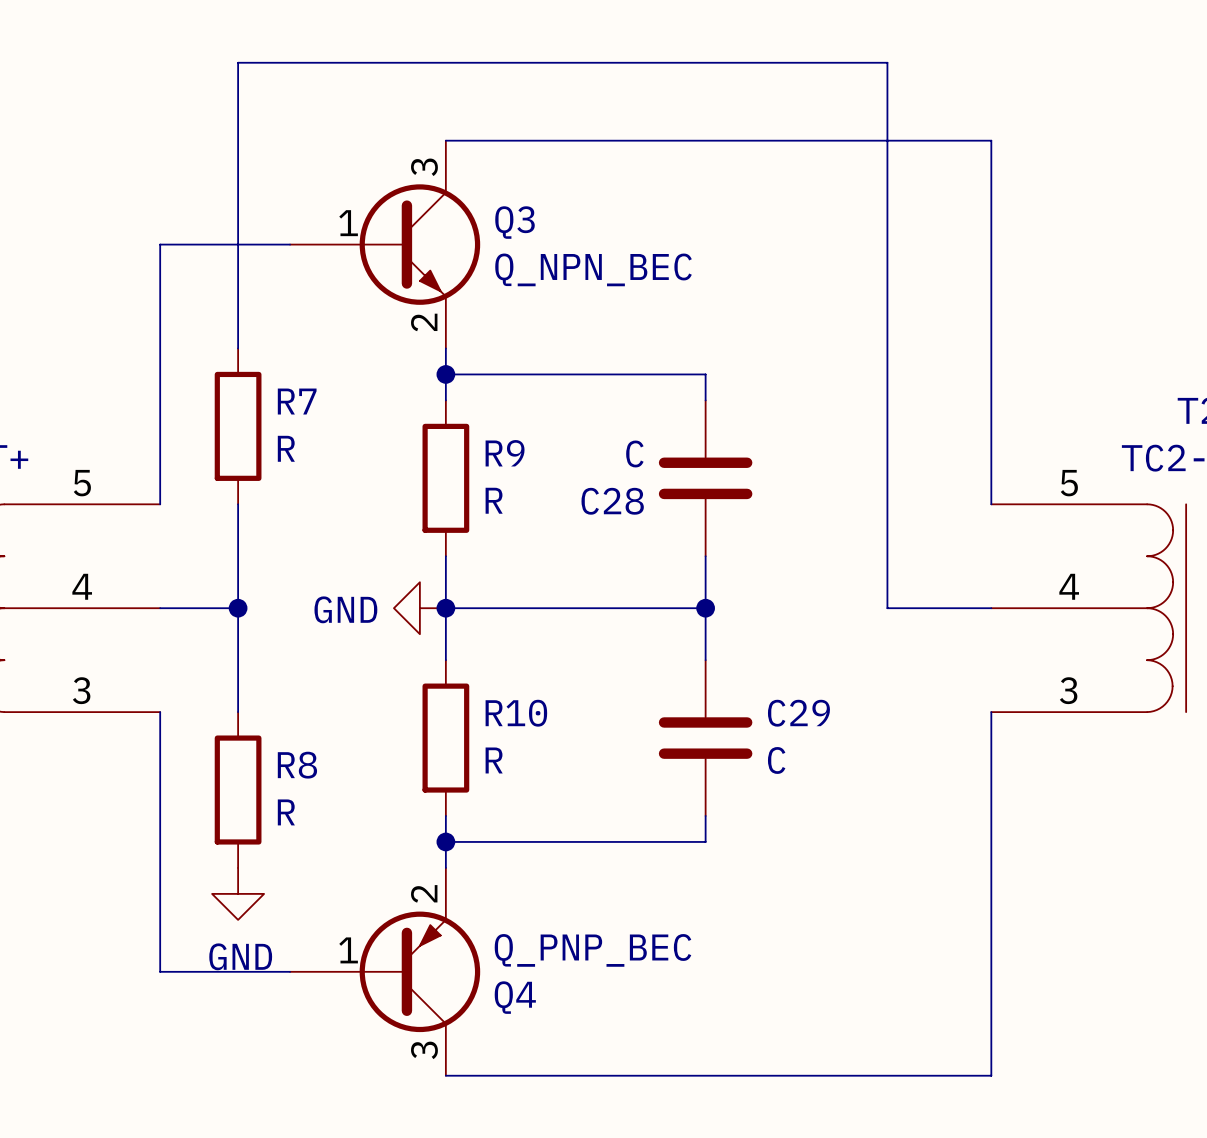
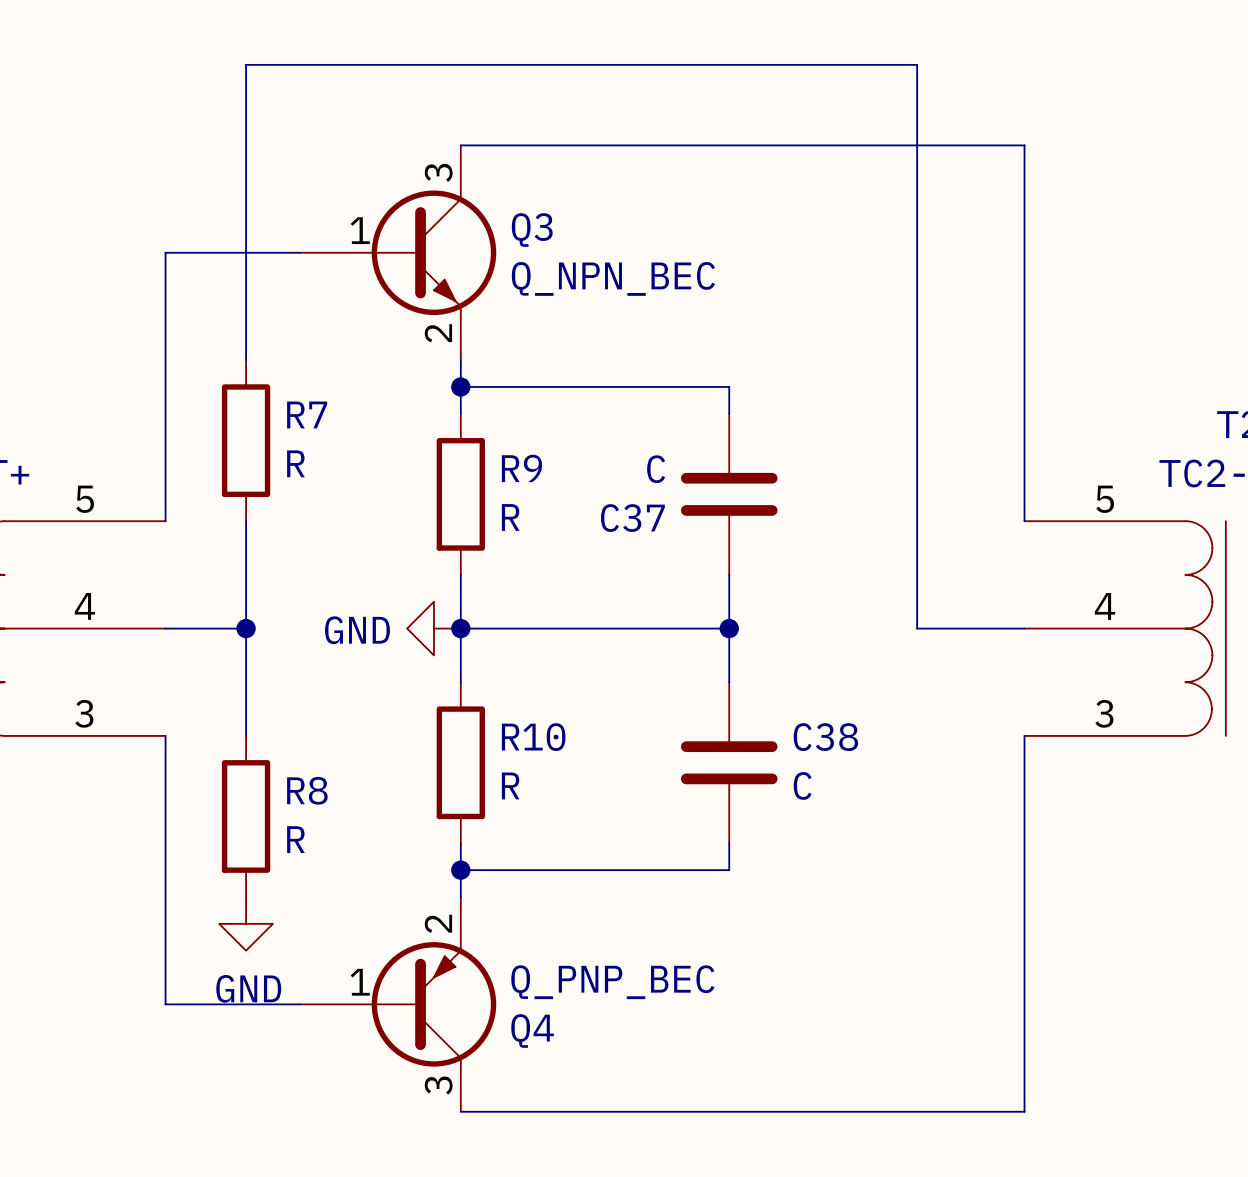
C28 name: C28 (612, 501) -> C37 (632, 518)
C29 name: C29 (798, 713) -> C38 (825, 737)

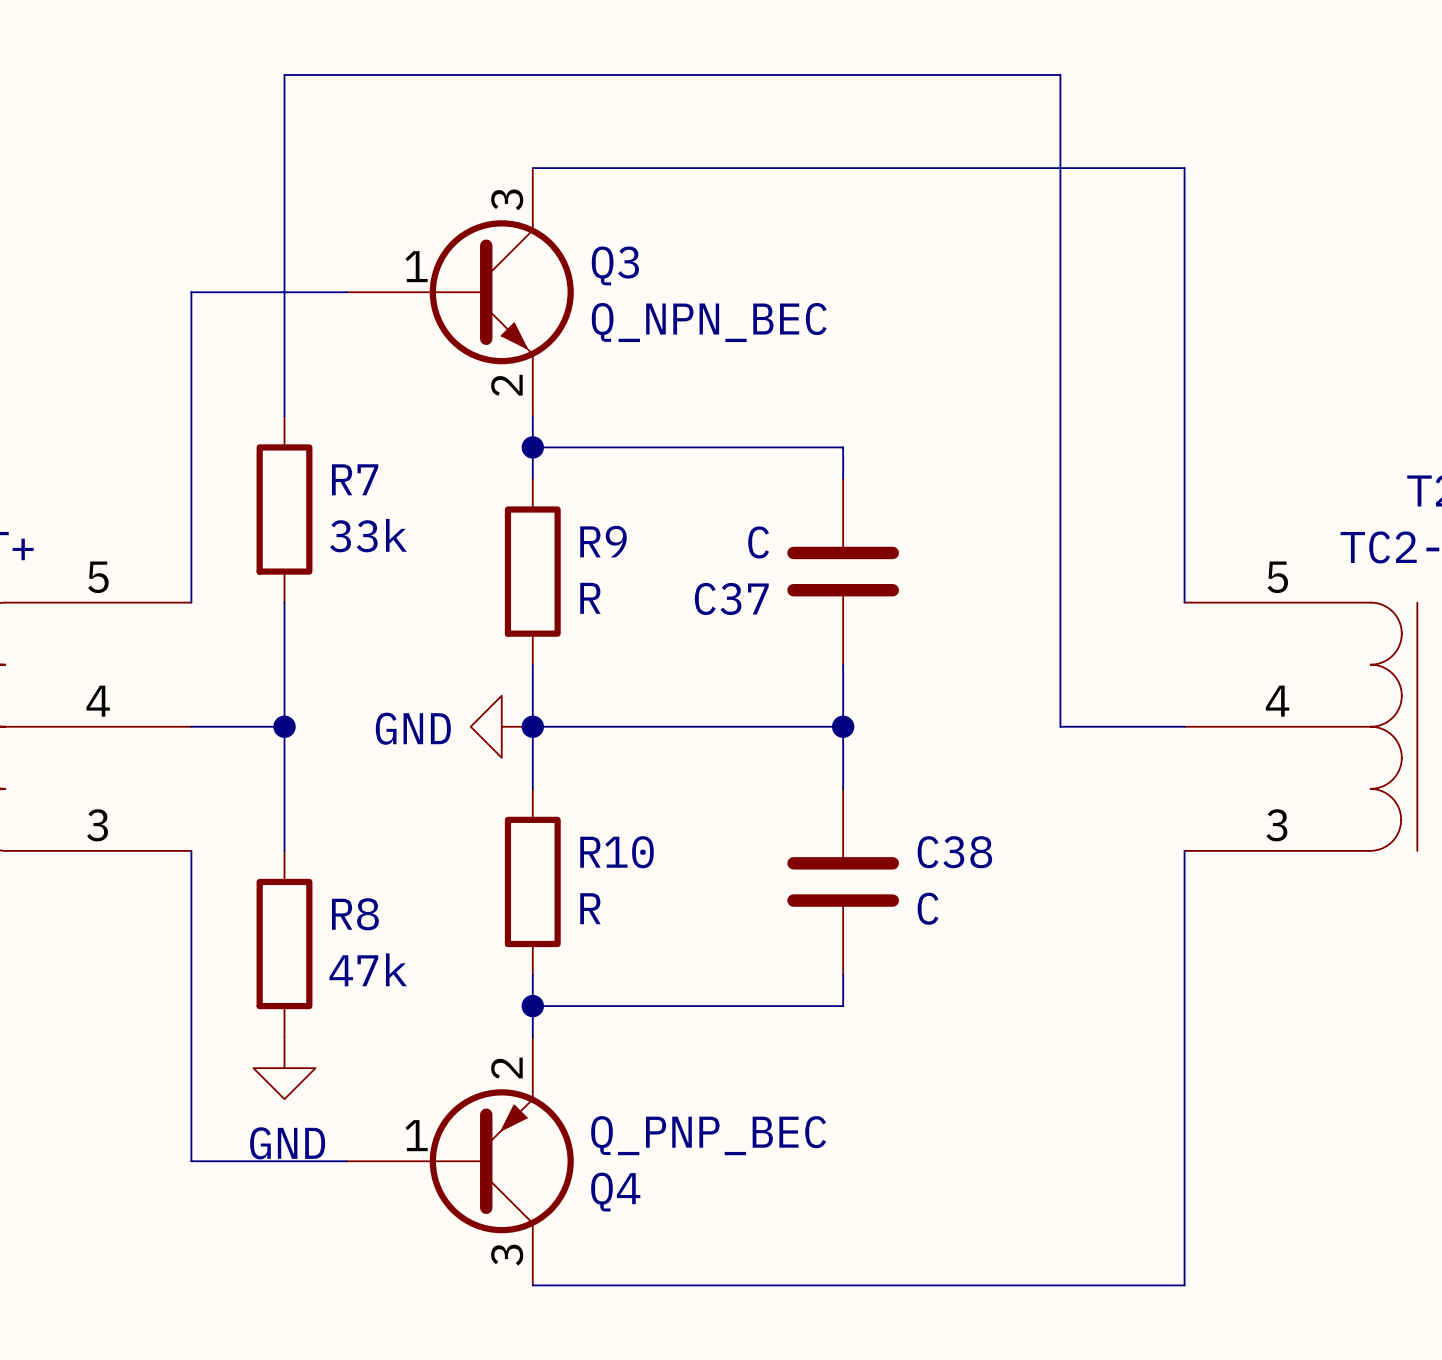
R7 value: R (295, 463) -> 33k (368, 535)
R8 value: R (295, 839) -> 47k (368, 969)

